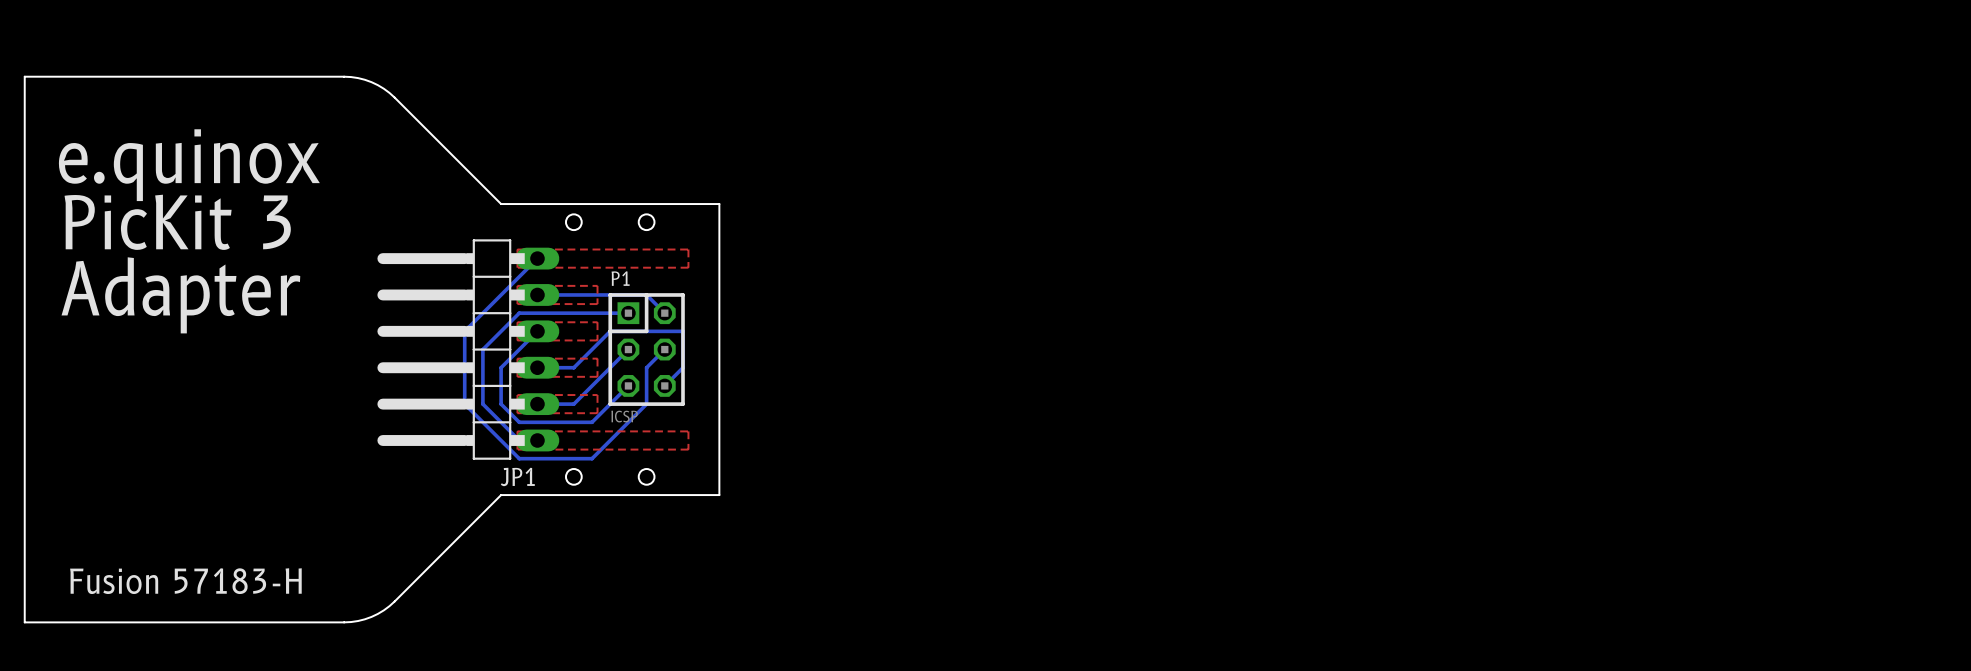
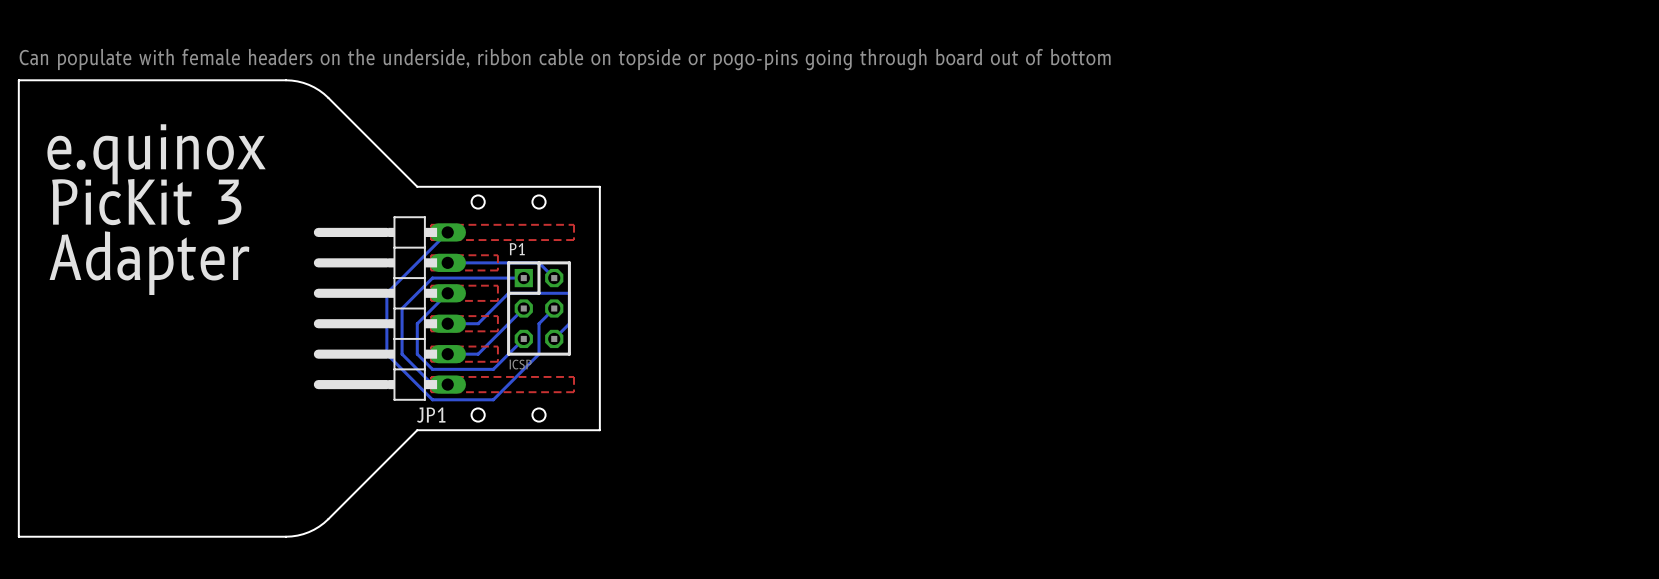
text: none -> Can populate with female headers on the underside, ribbon cable on topside or pogo-pins going through board out of bottom (565, 59)
text: Fusion 57183-H (185, 581) -> none

